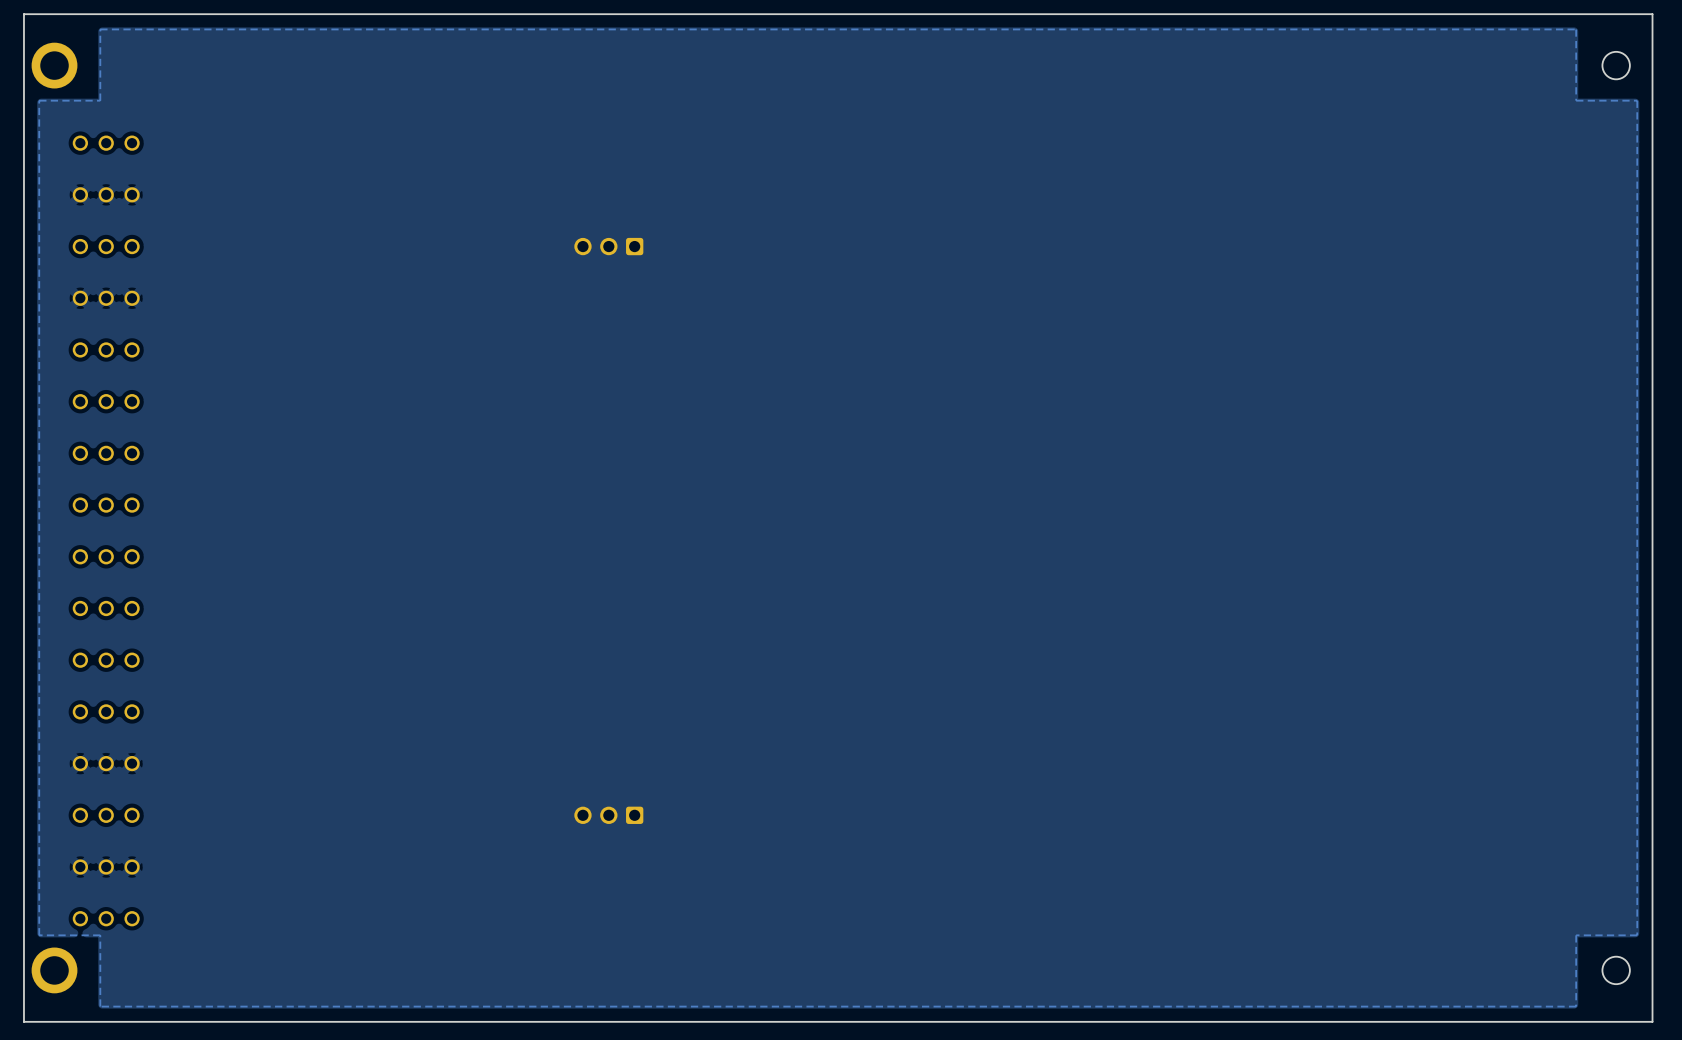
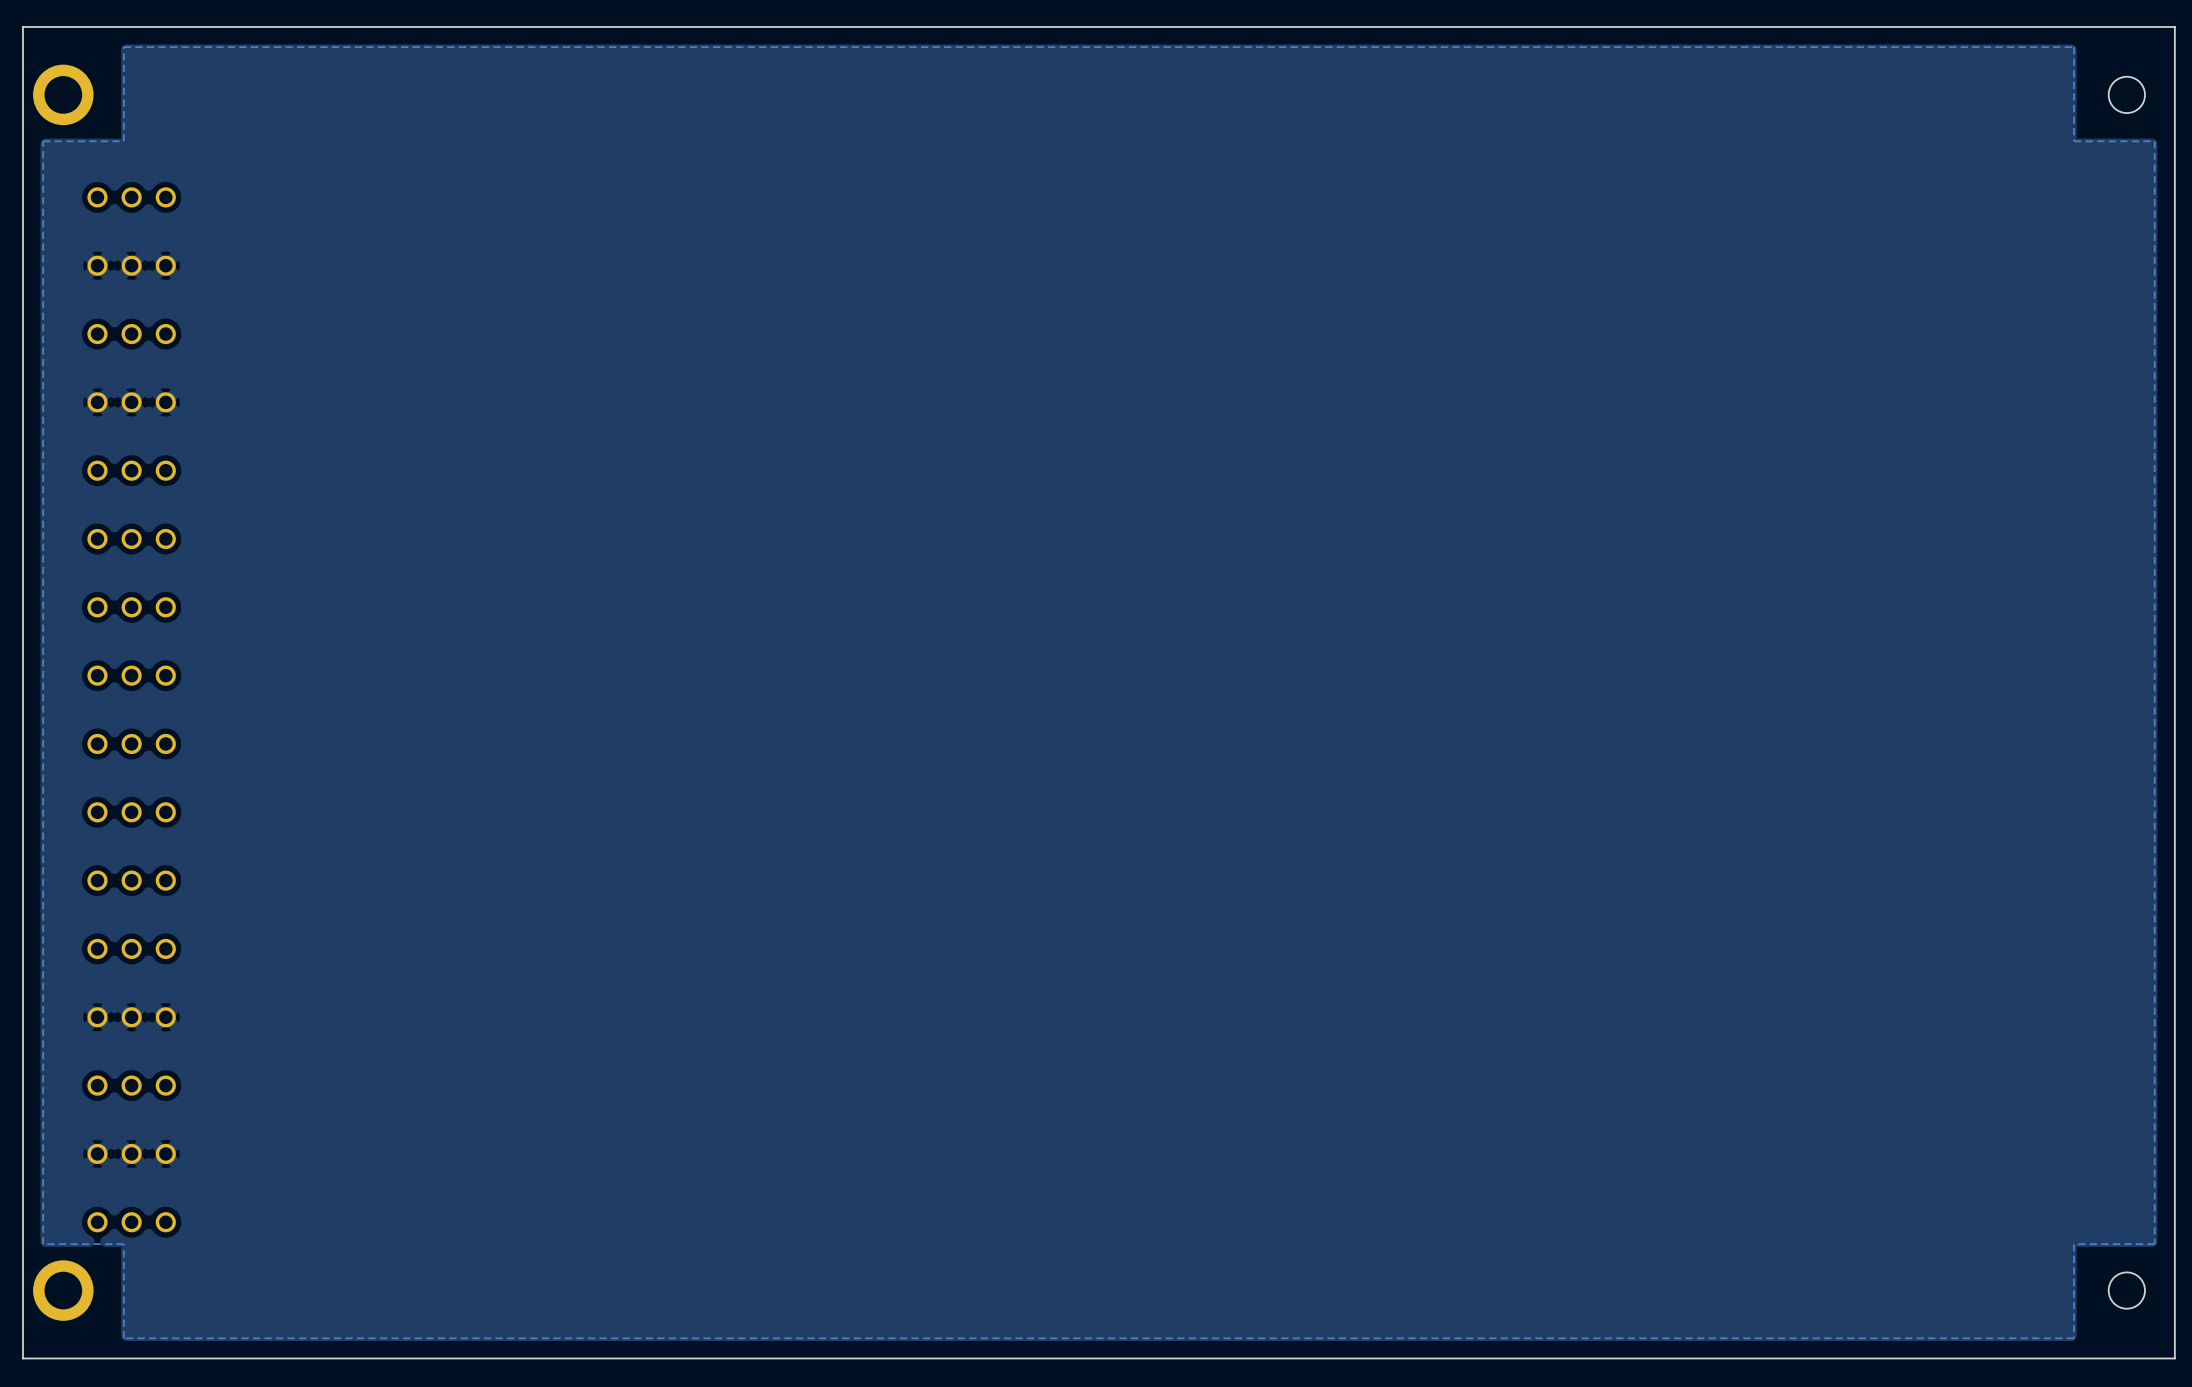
part: (608, 246) -> none
part: (608, 815) -> none

